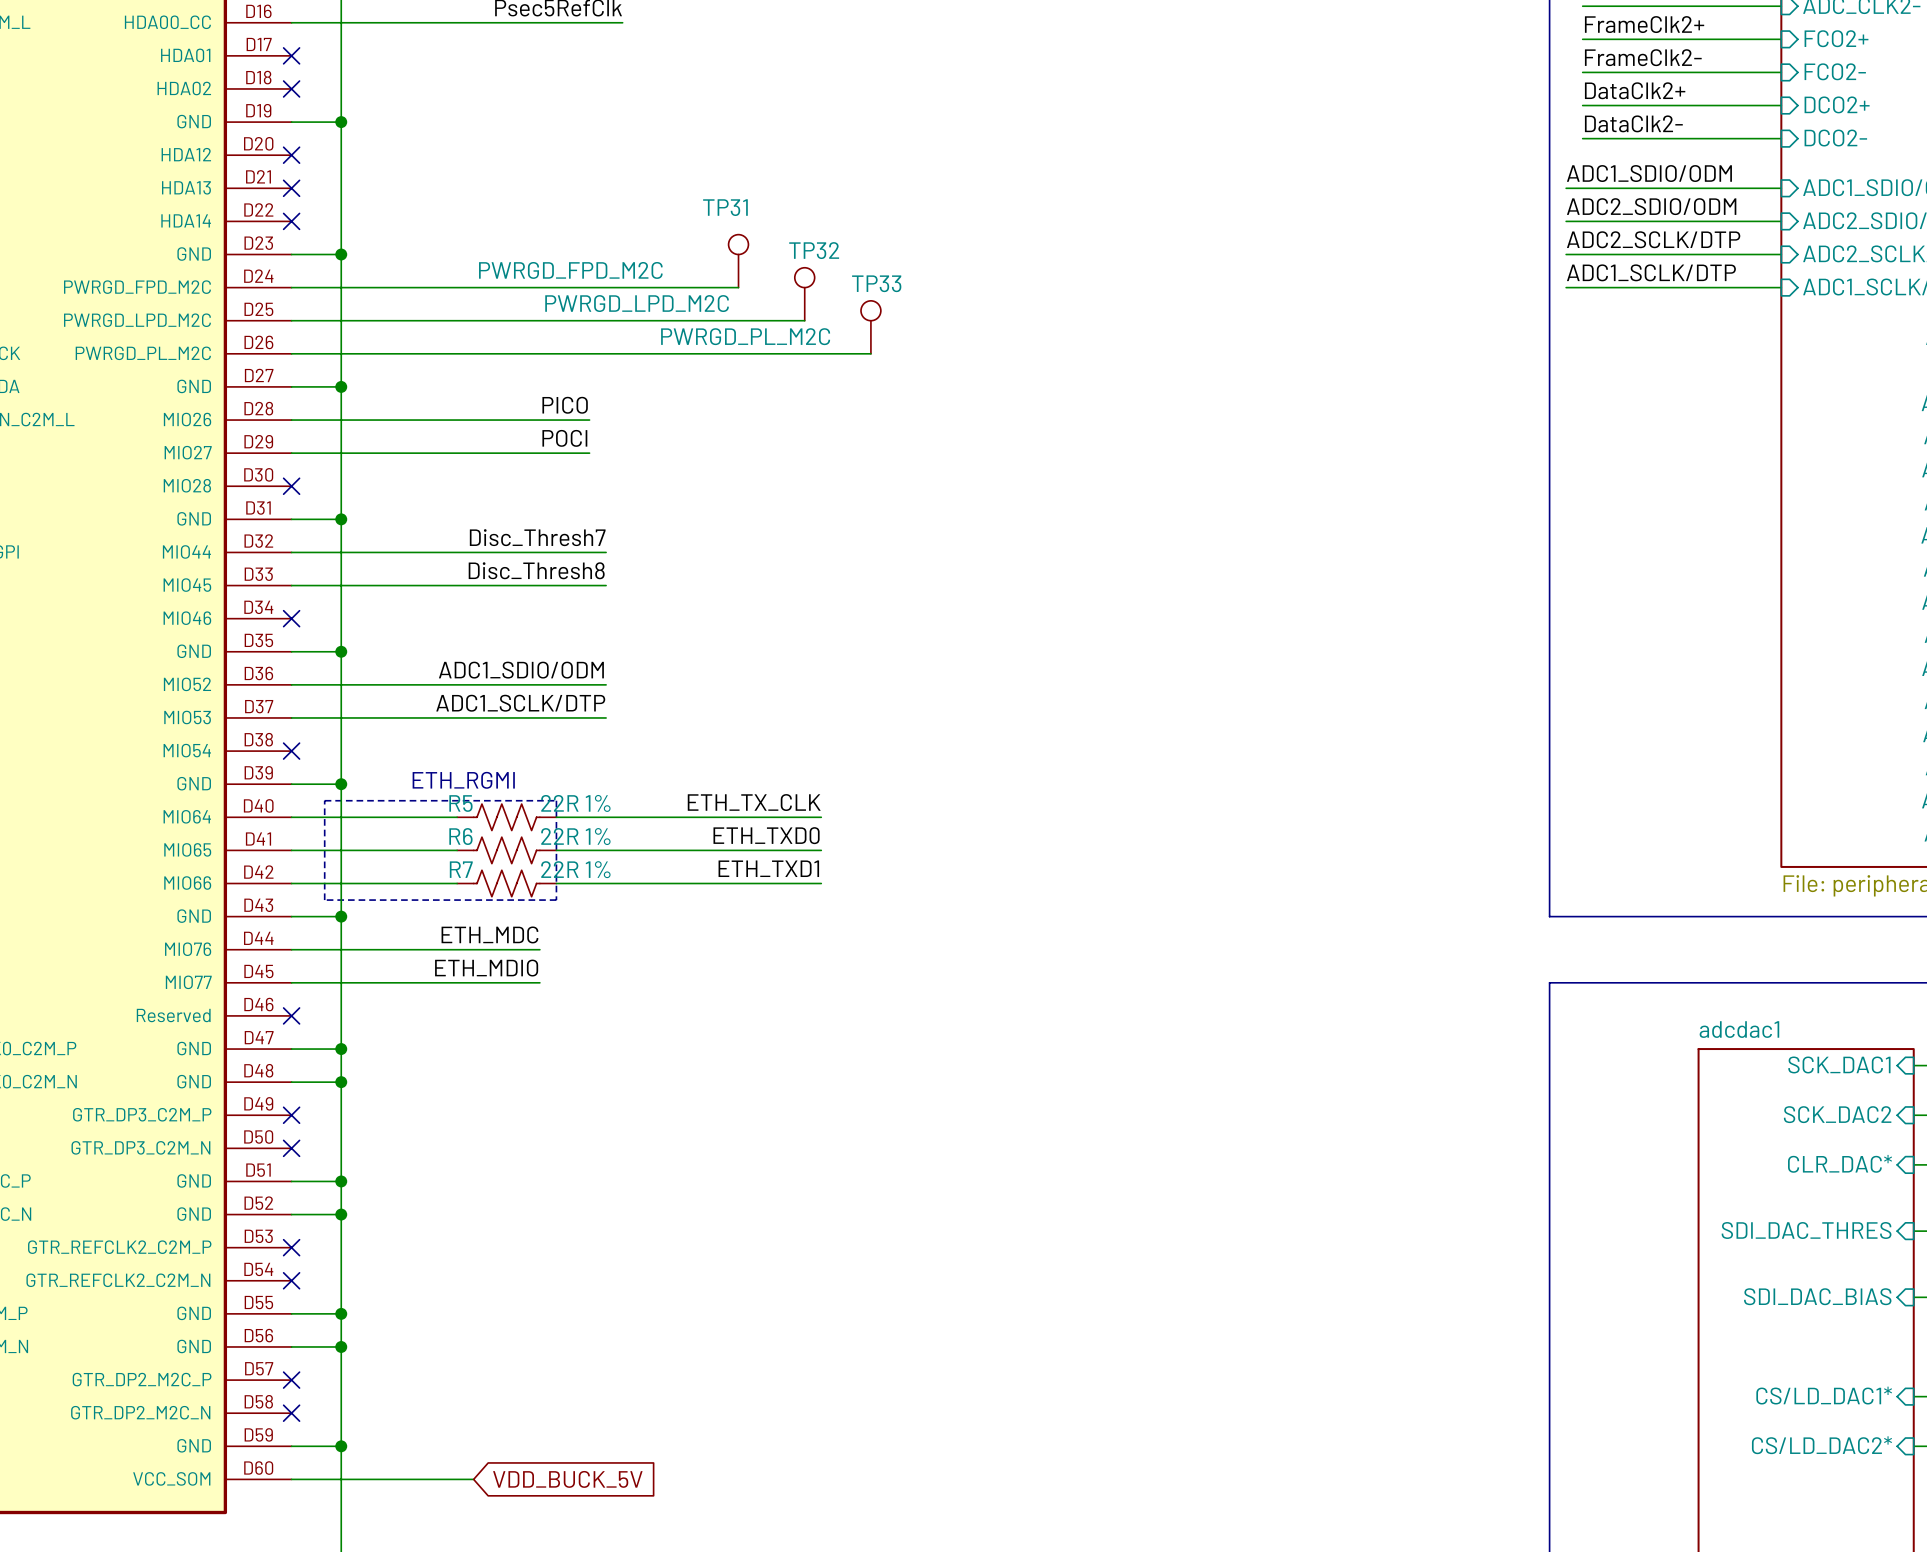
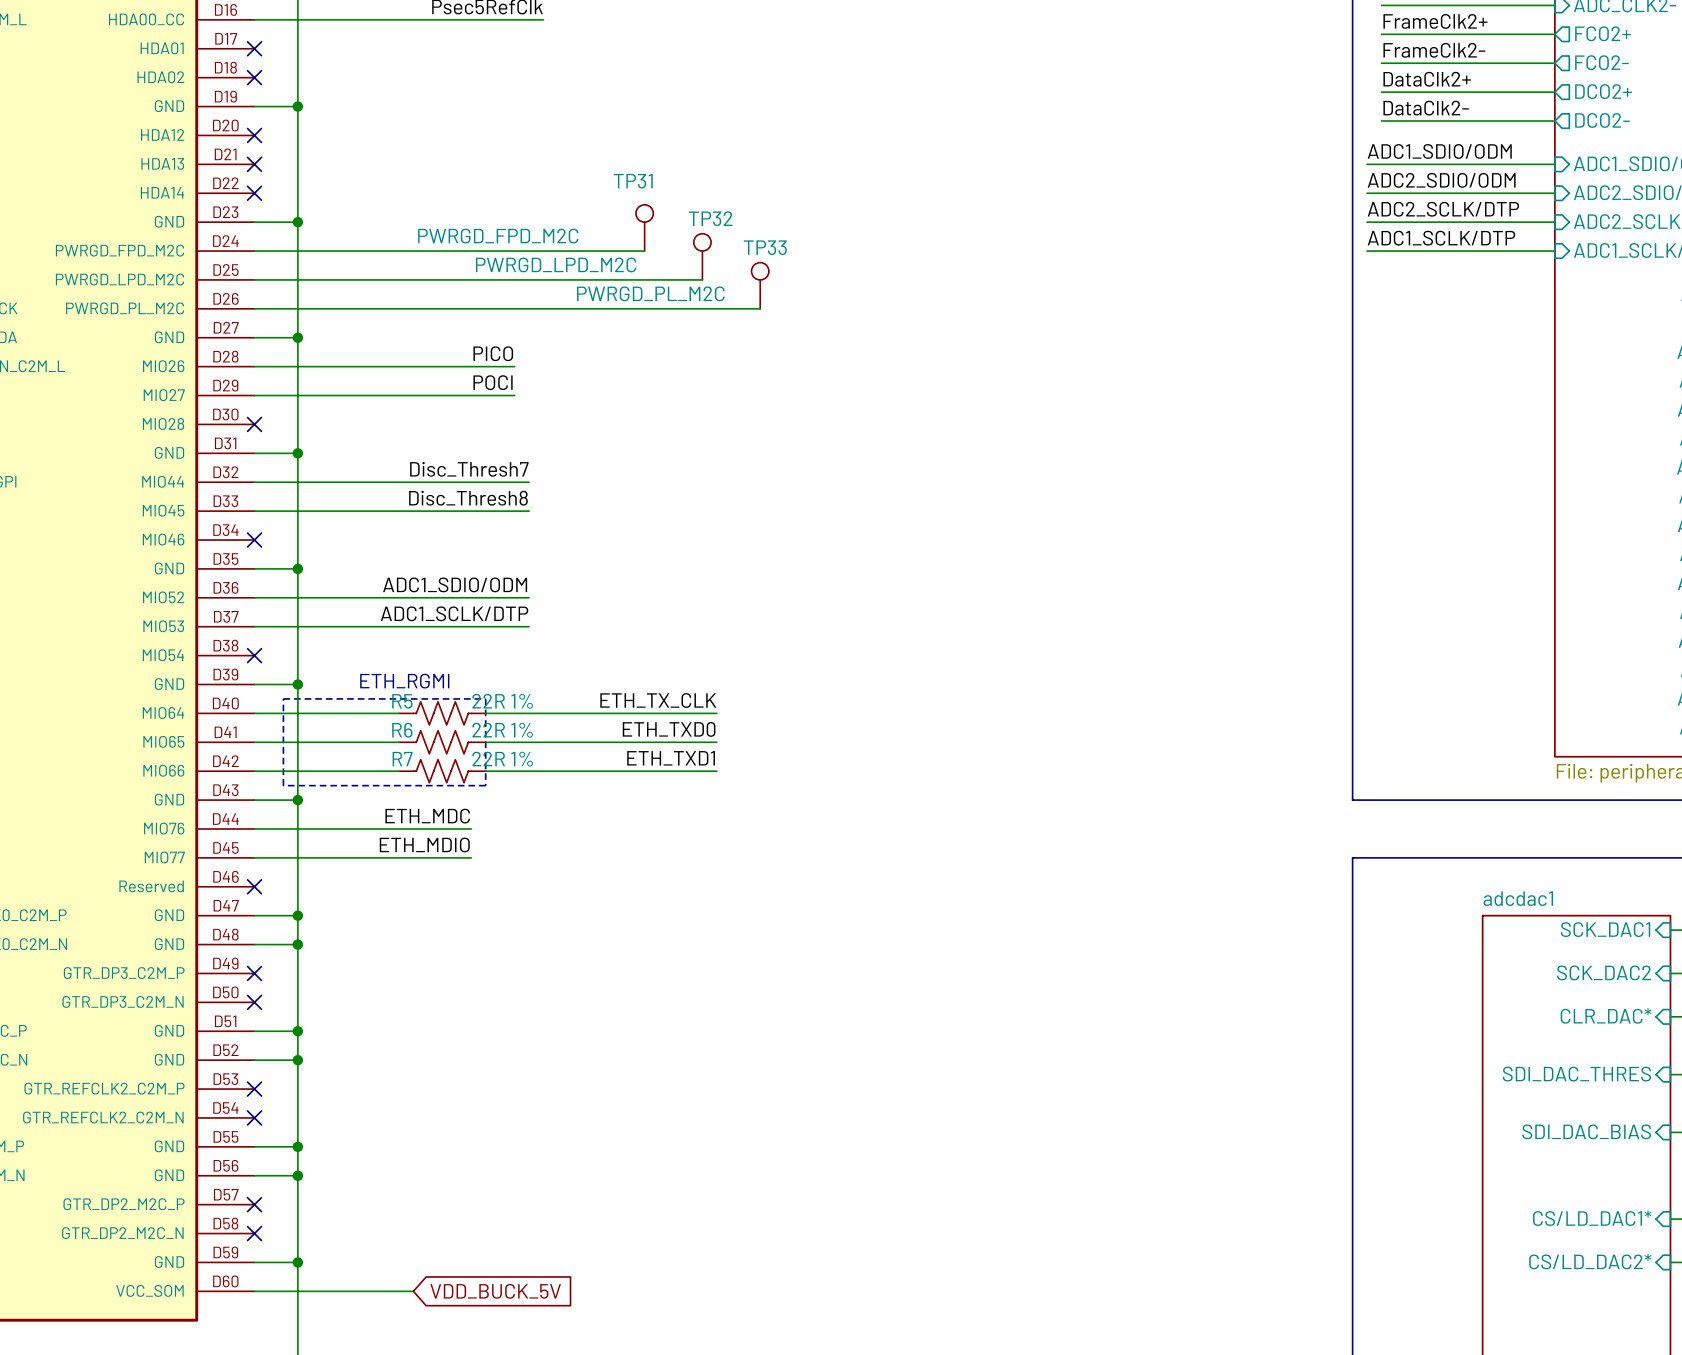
sheet pin shape: input (1836, 38) -> output (1603, 33)
sheet pin shape: input (1835, 71) -> output (1601, 62)
sheet pin shape: input (1837, 104) -> output (1603, 91)
sheet pin shape: input (1835, 138) -> output (1602, 120)

